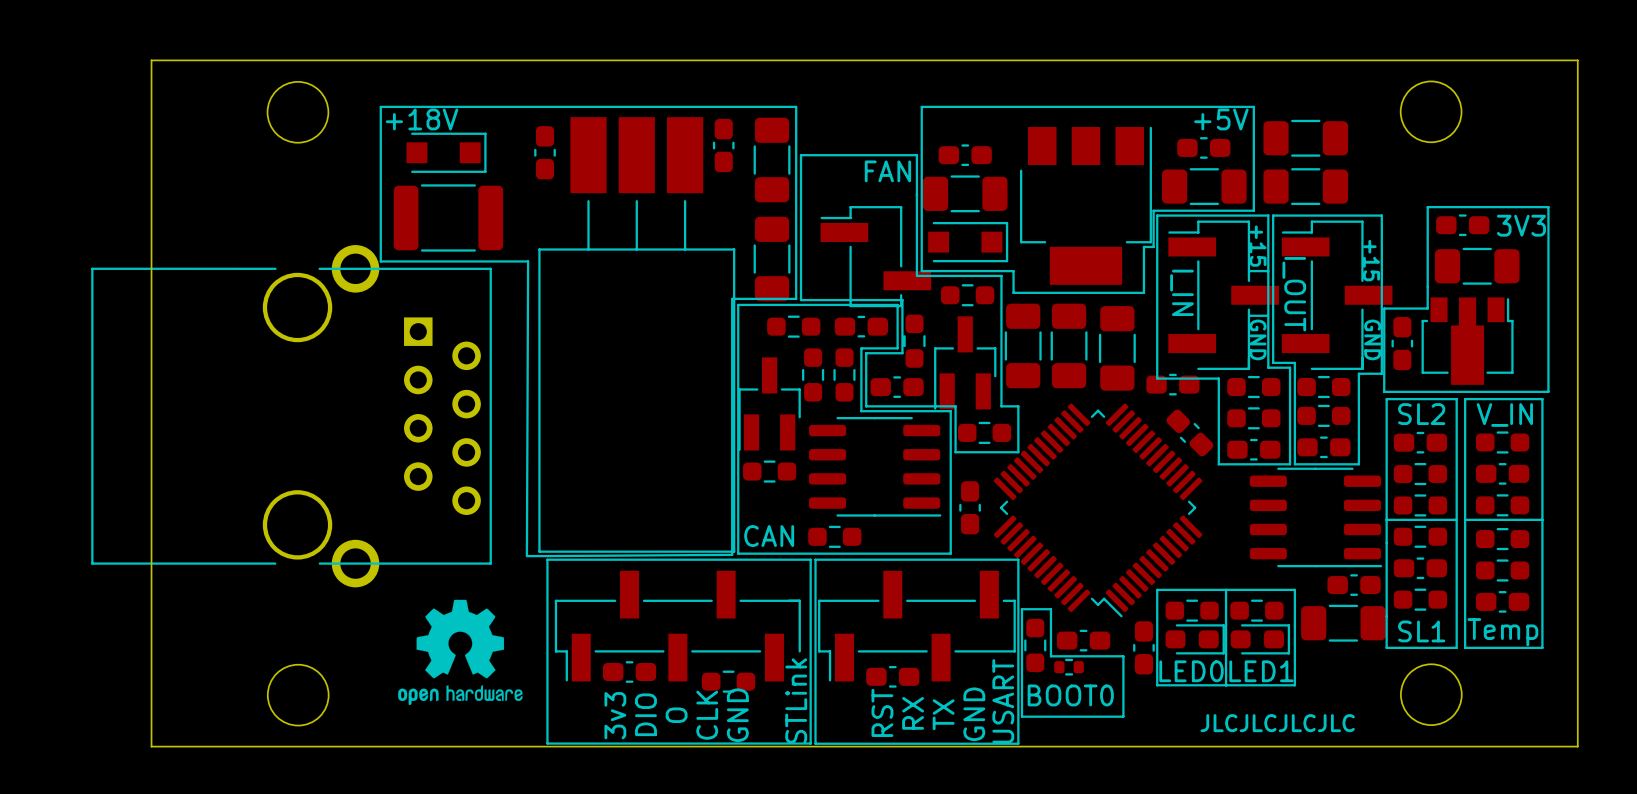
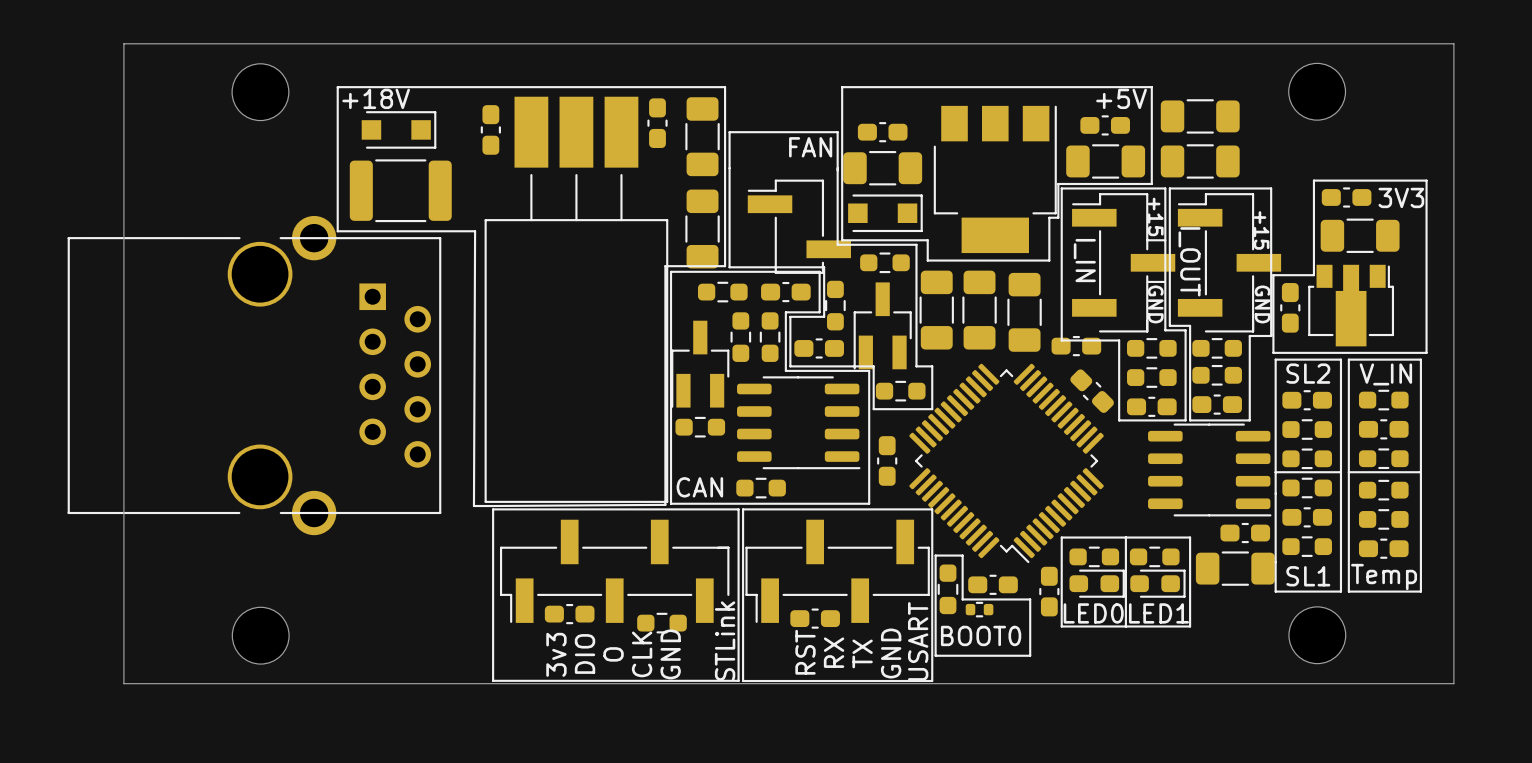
drawing: [398, 599, 523, 706] -> none
text: JLCJLCJLCJLC (1277, 723) -> none

